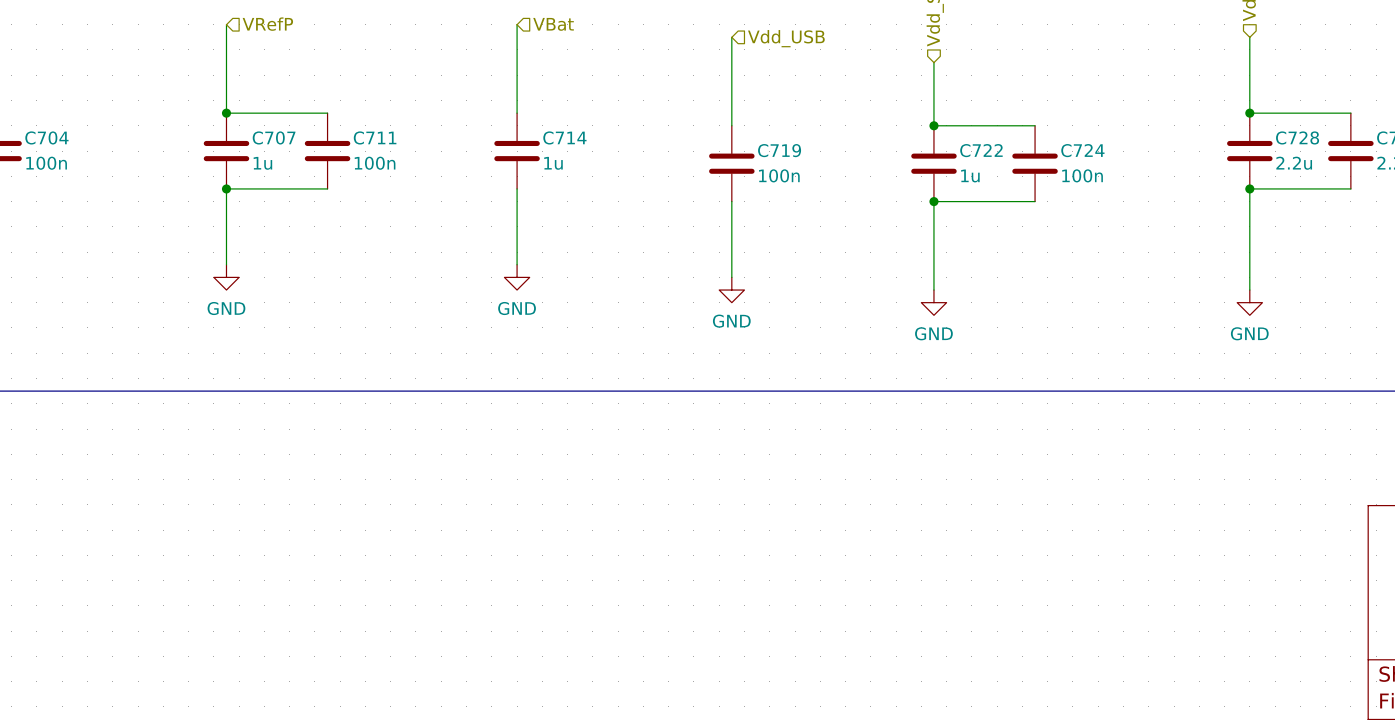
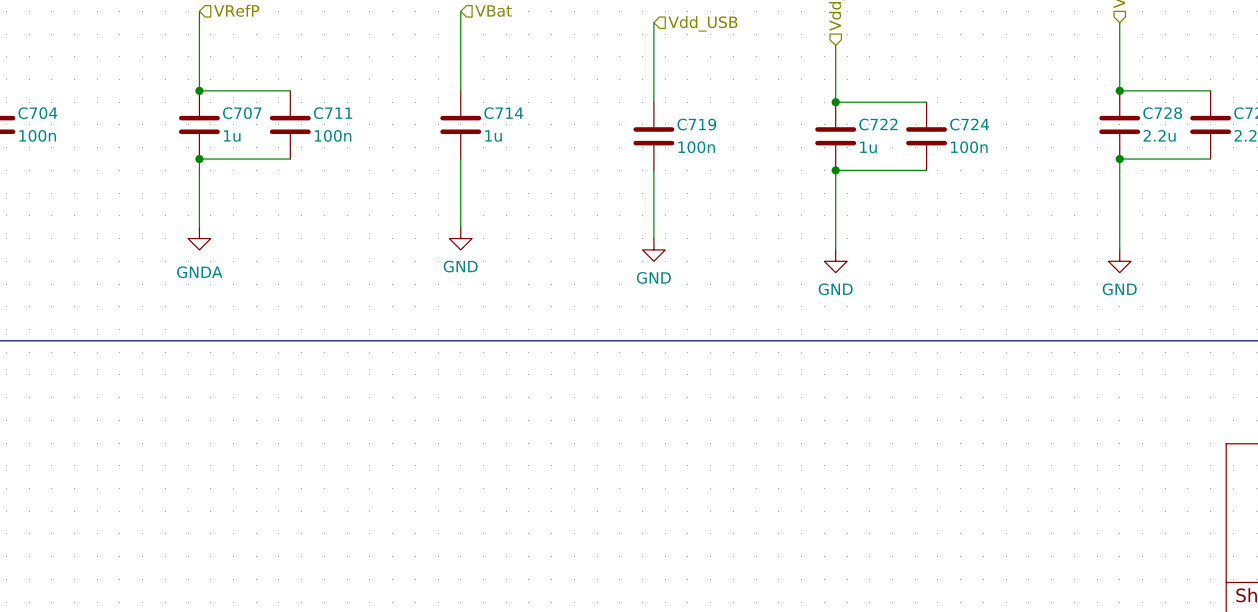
power symbol: GND (226, 277) -> GNDA (199, 238)

